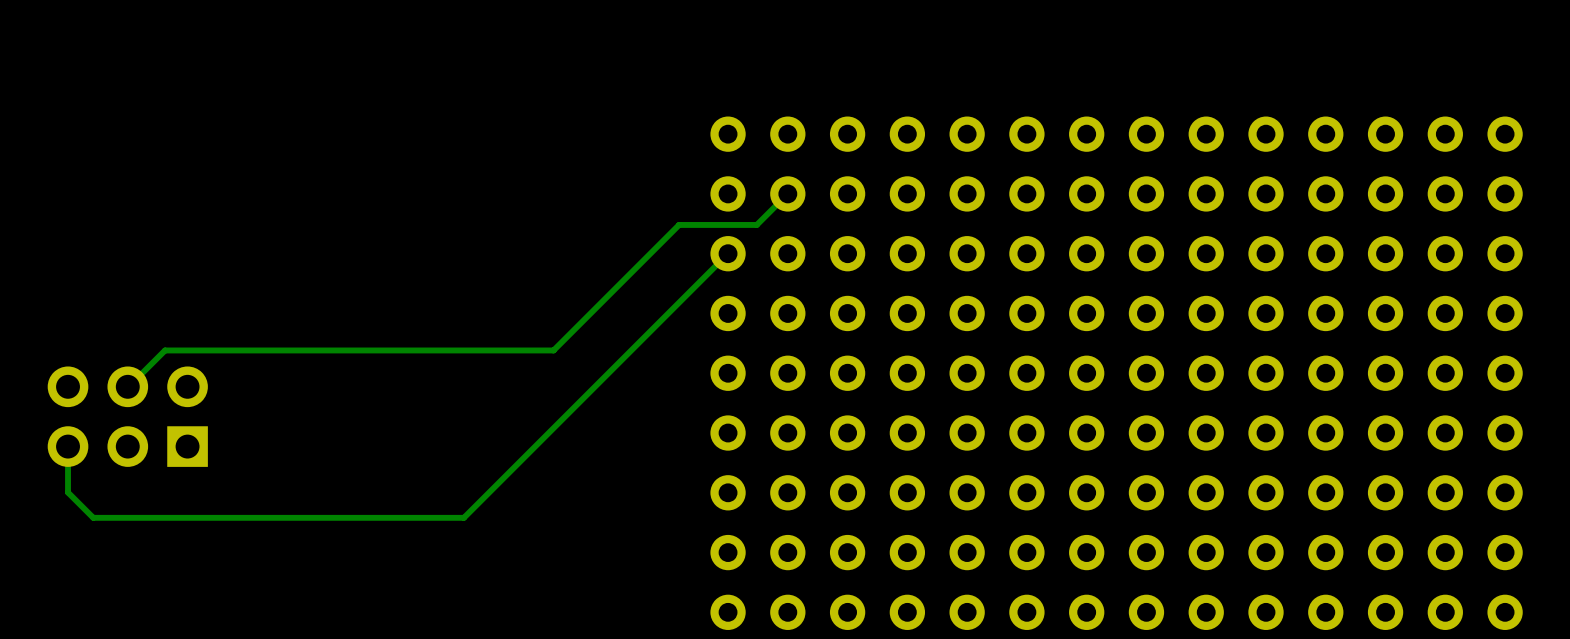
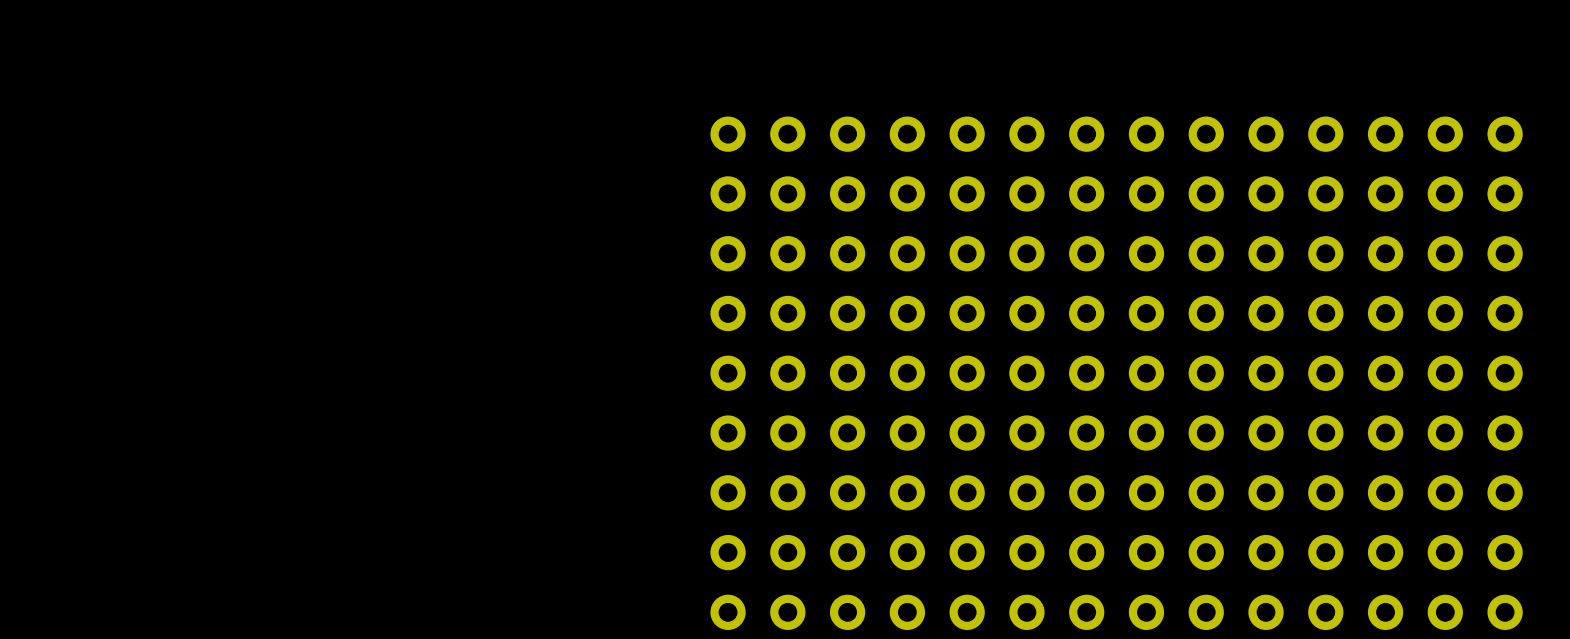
track: (787, 193) (756, 224) (679, 224) (553, 350) (165, 350) (127, 386) -> none
track: (728, 253) (463, 517) (93, 517) (68, 492) (68, 446) -> none
part: (127, 416) -> none

